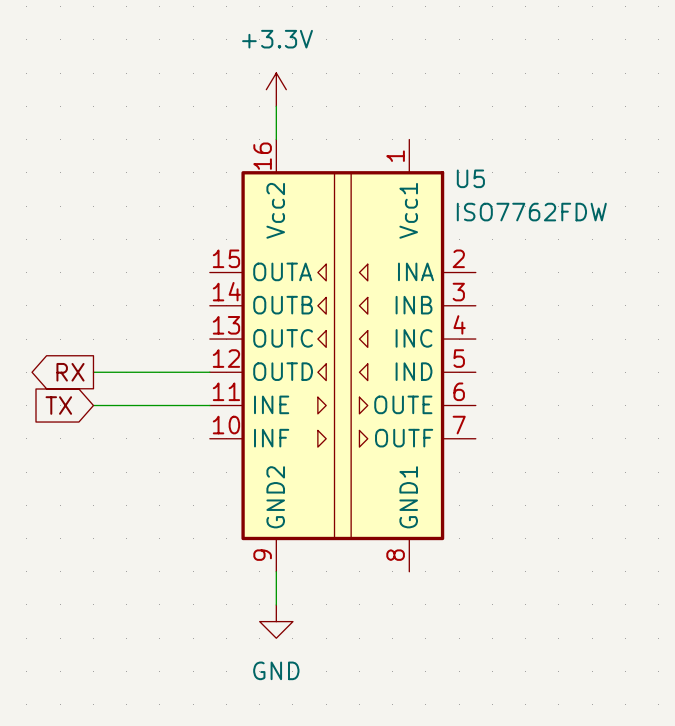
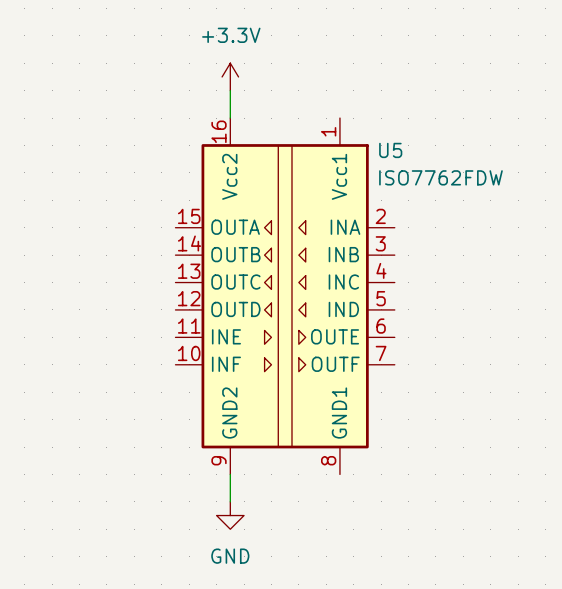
global label: RX (70, 372) -> none
wire: (93, 372) (209, 372) -> none
global label: TX (58, 405) -> none
wire: (93, 405) (209, 405) -> none

